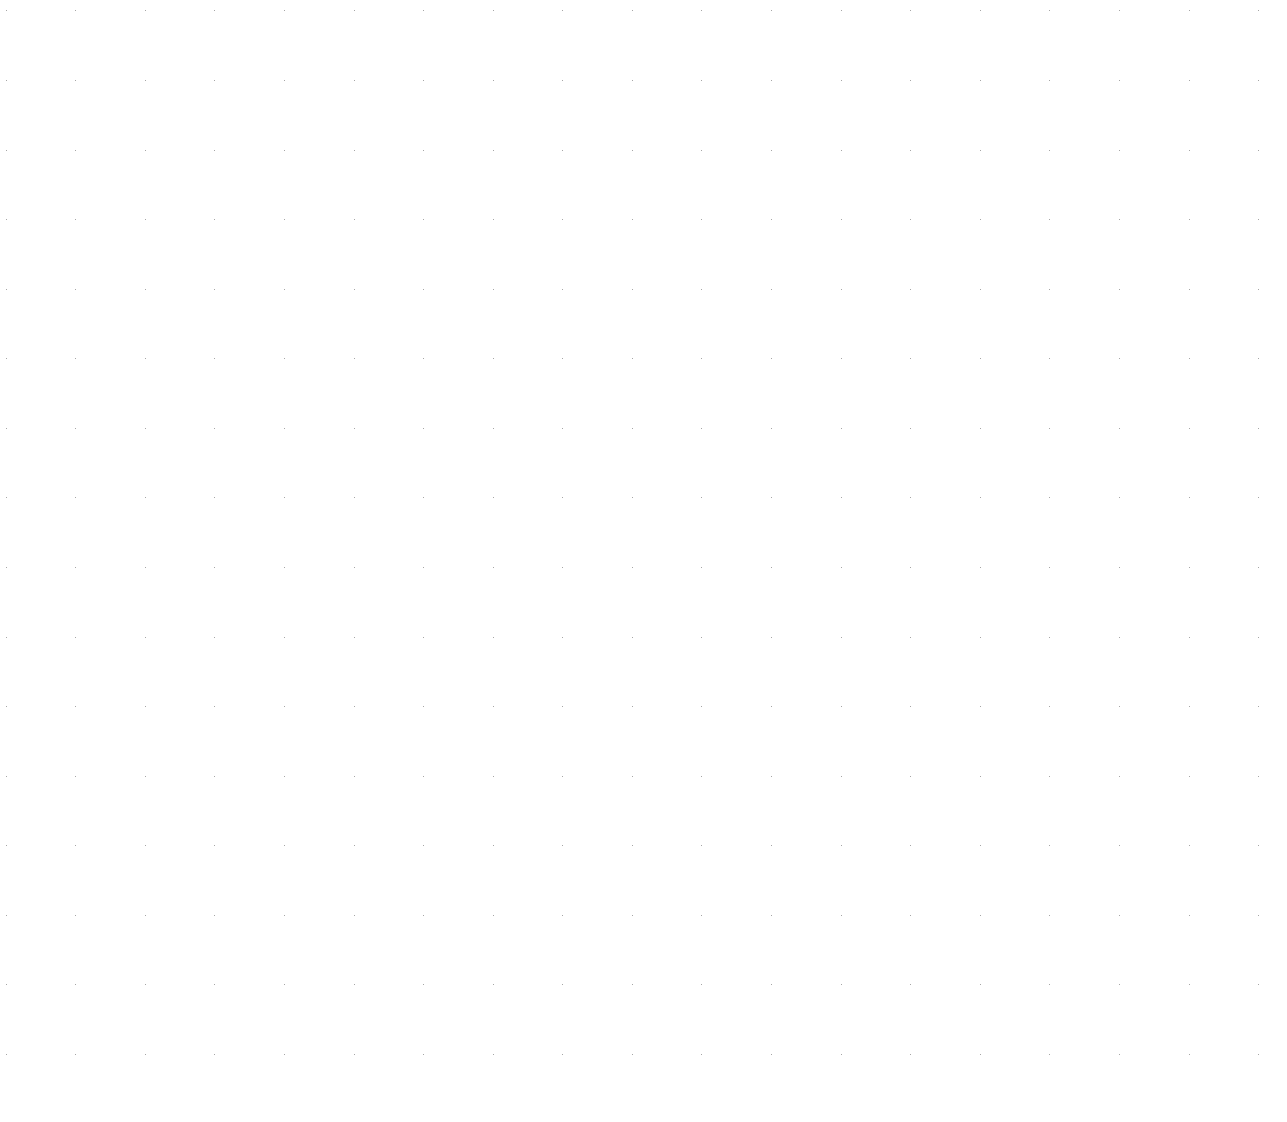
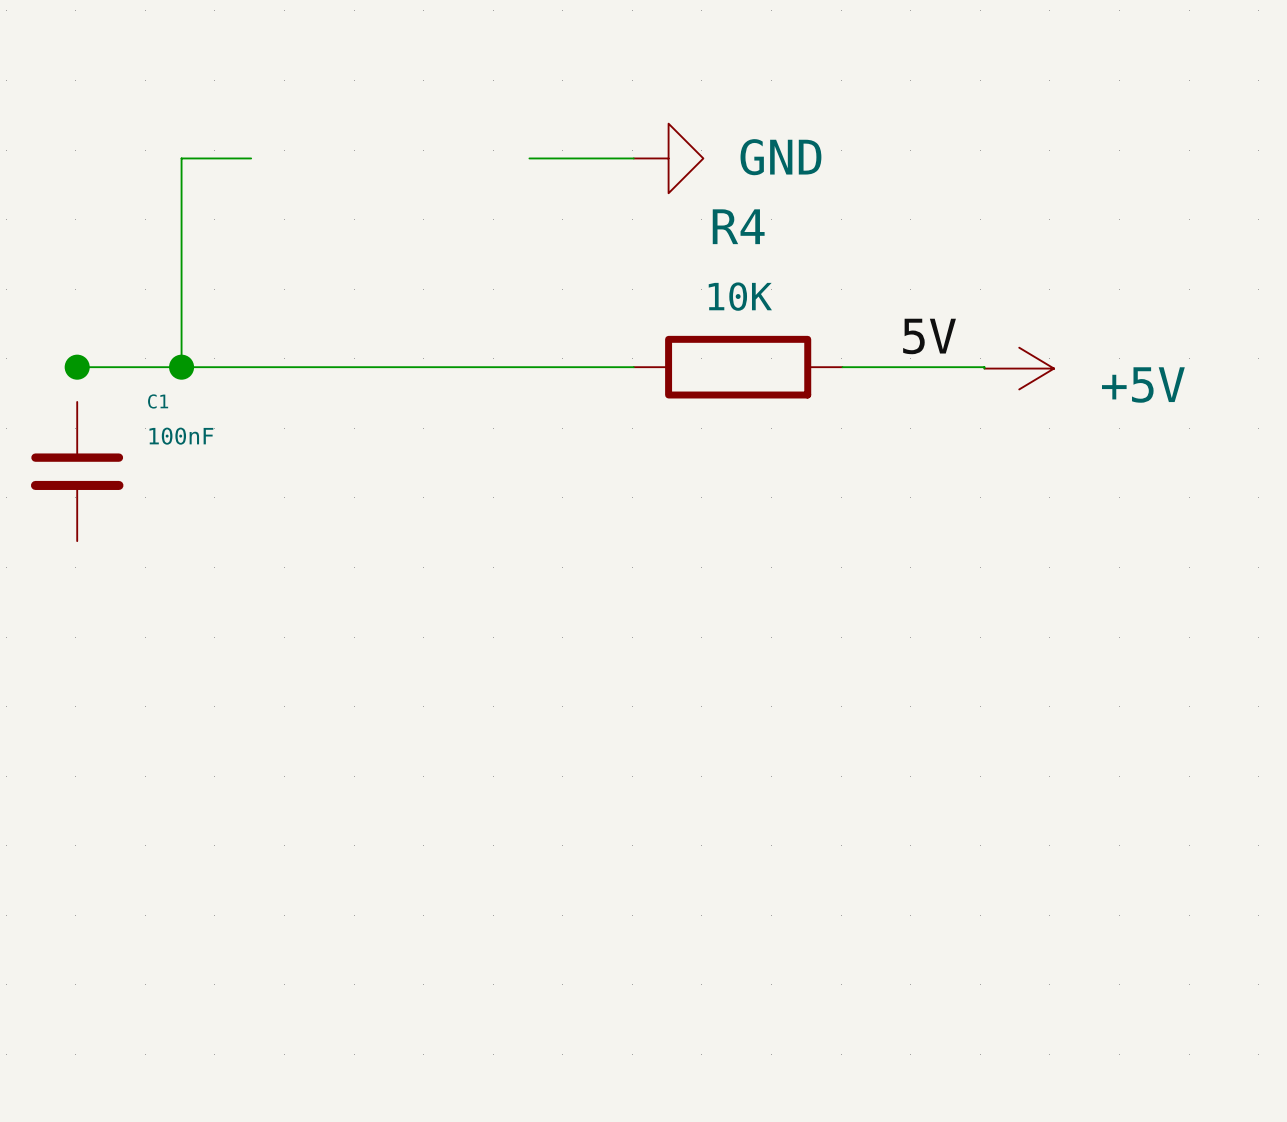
wire: none -> (251, 158) (181, 158) (181, 367)
wire: none -> (529, 158) (633, 158)
power symbol: none -> GND (668, 158)
label: none -> 5V (929, 336)
wire: none -> (77, 367) (633, 367)
junction: none -> (77, 367)
junction: none -> (181, 367)
R4: none -> 10K (738, 367)
wire: none -> (842, 367) (984, 368)
power symbol: none -> +5V (1019, 368)
C1: none -> 100nF (77, 471)

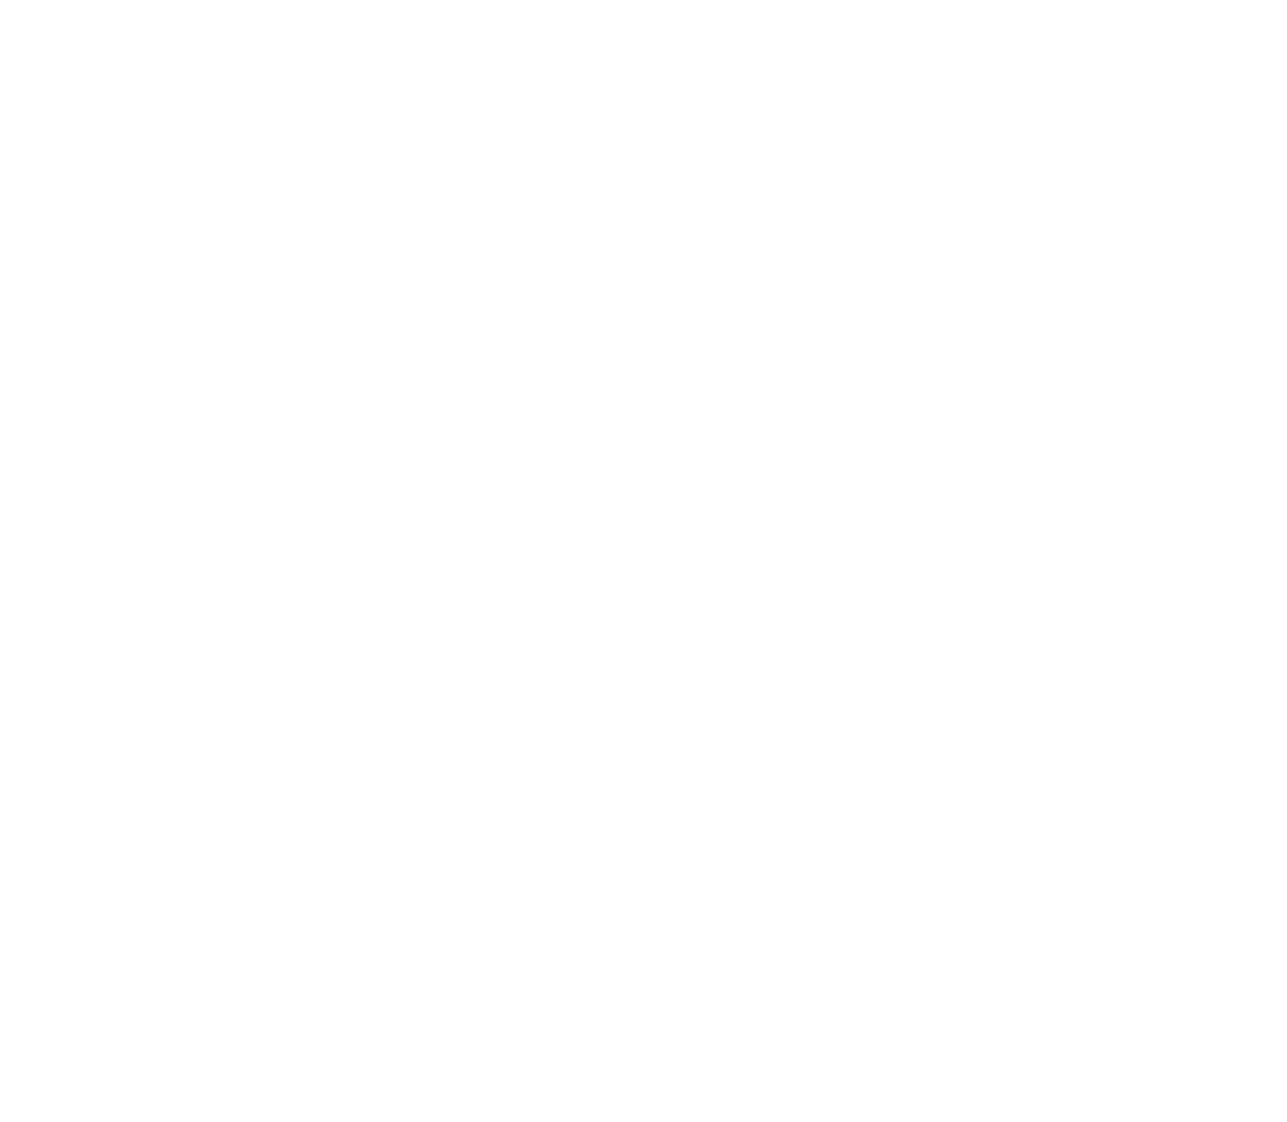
wire: (251, 158) (181, 158) (181, 367) -> none
wire: (529, 158) (633, 158) -> none
power symbol: GND (668, 158) -> none
label: 5V (929, 336) -> none
wire: (77, 367) (633, 367) -> none
junction: (77, 367) -> none
junction: (181, 367) -> none
R4: 10K (738, 367) -> none
wire: (842, 367) (984, 368) -> none
power symbol: +5V (1019, 368) -> none
C1: 100nF (77, 471) -> none

